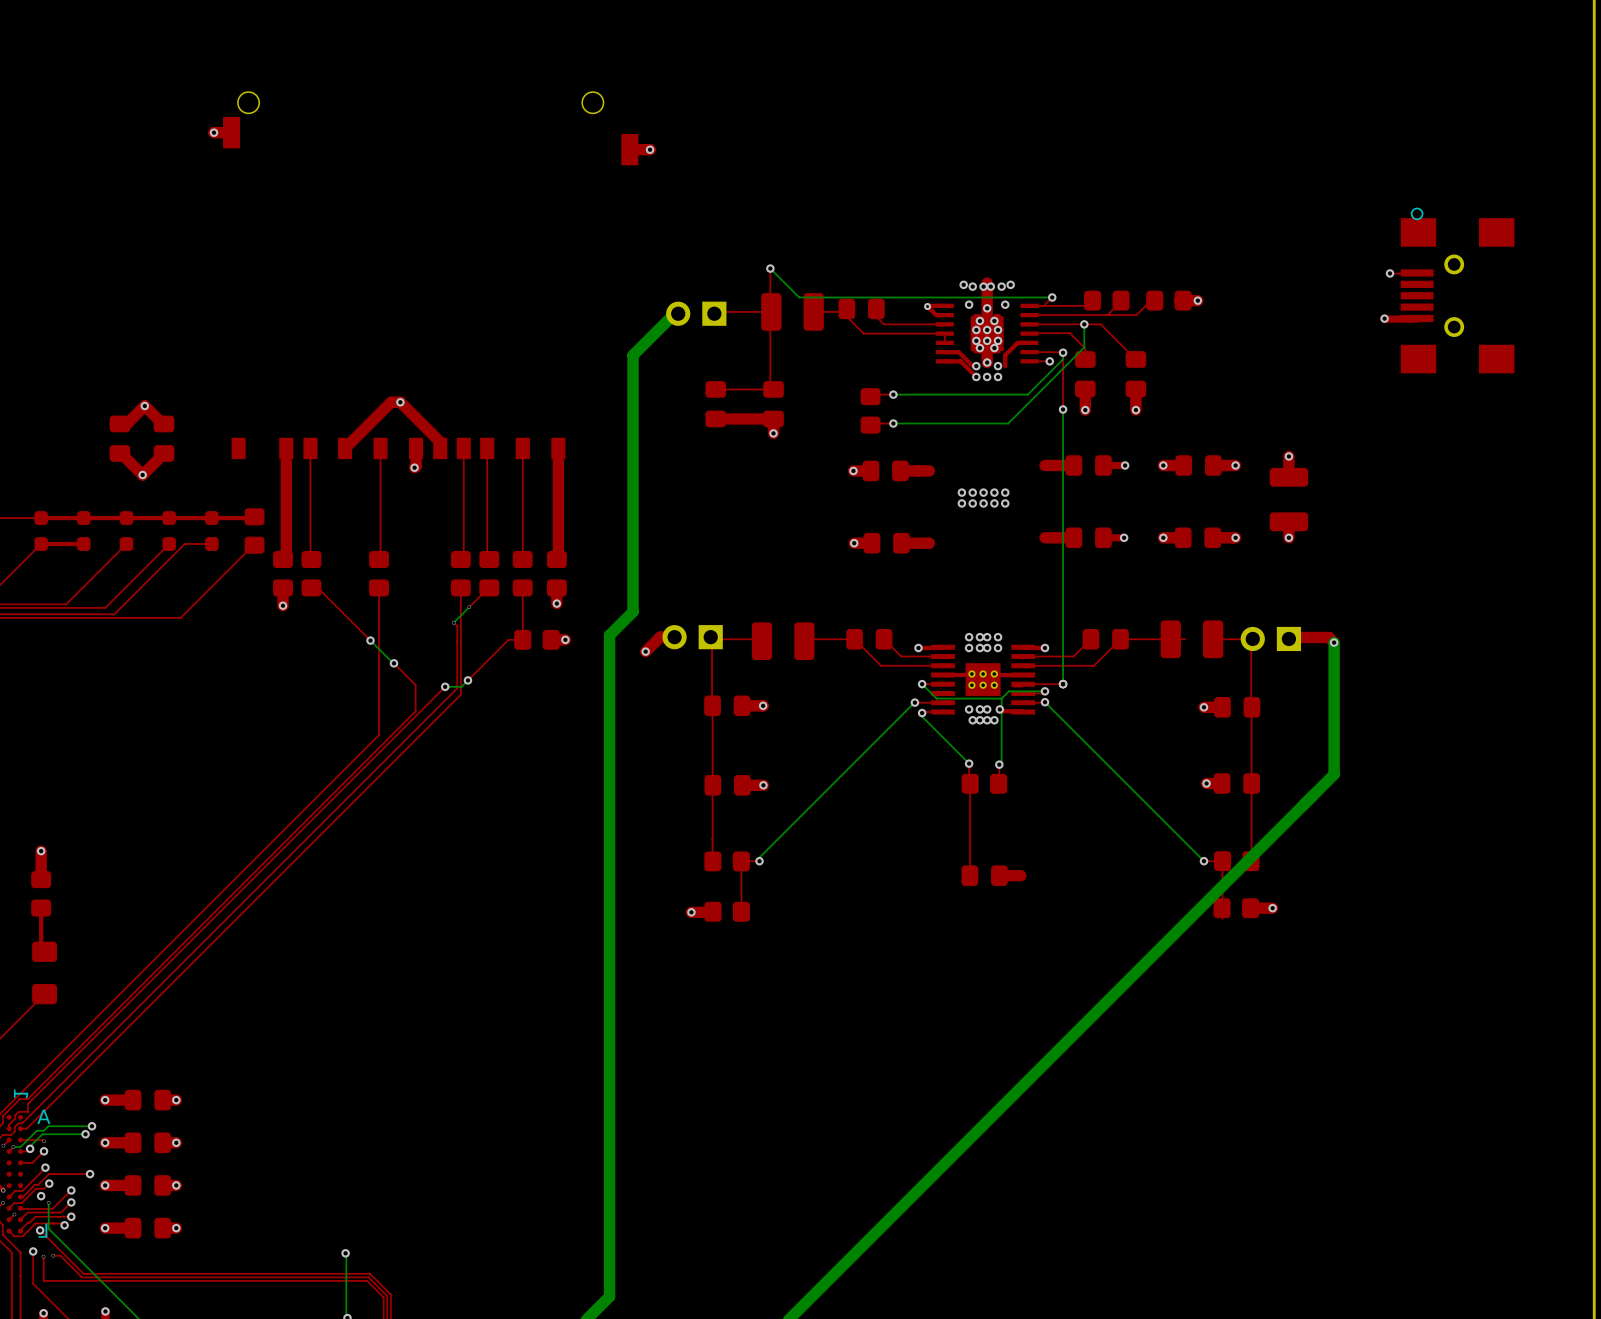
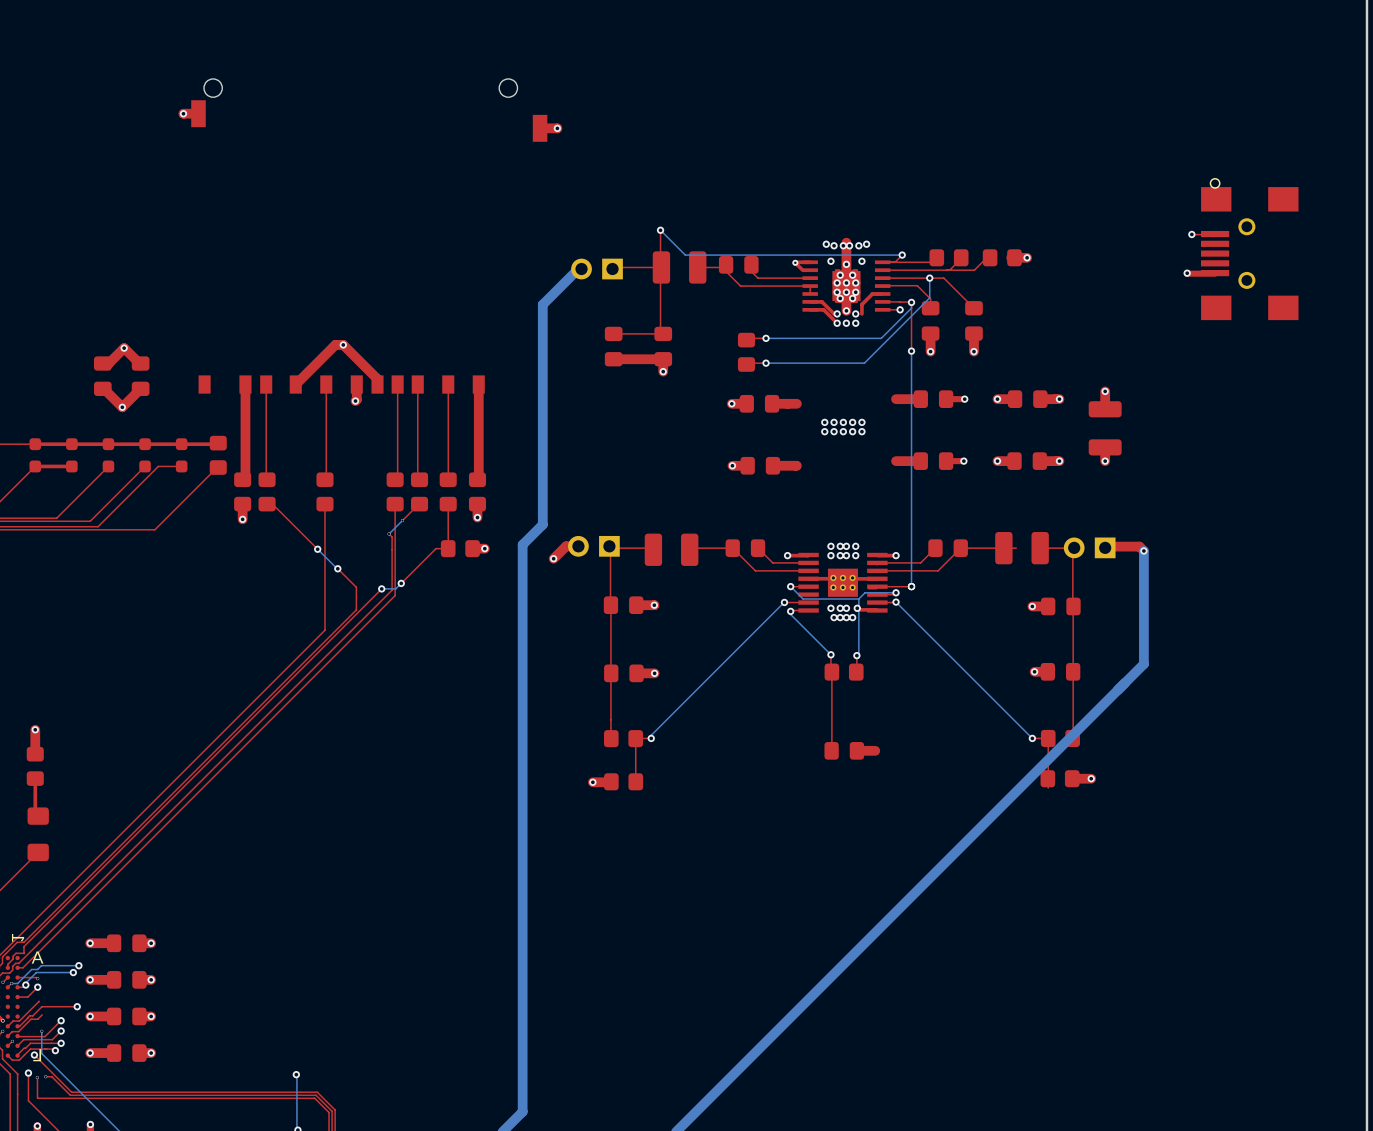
via: (45, 1167) -> none
via: (49, 1183) -> none
via: (41, 1196) -> none

